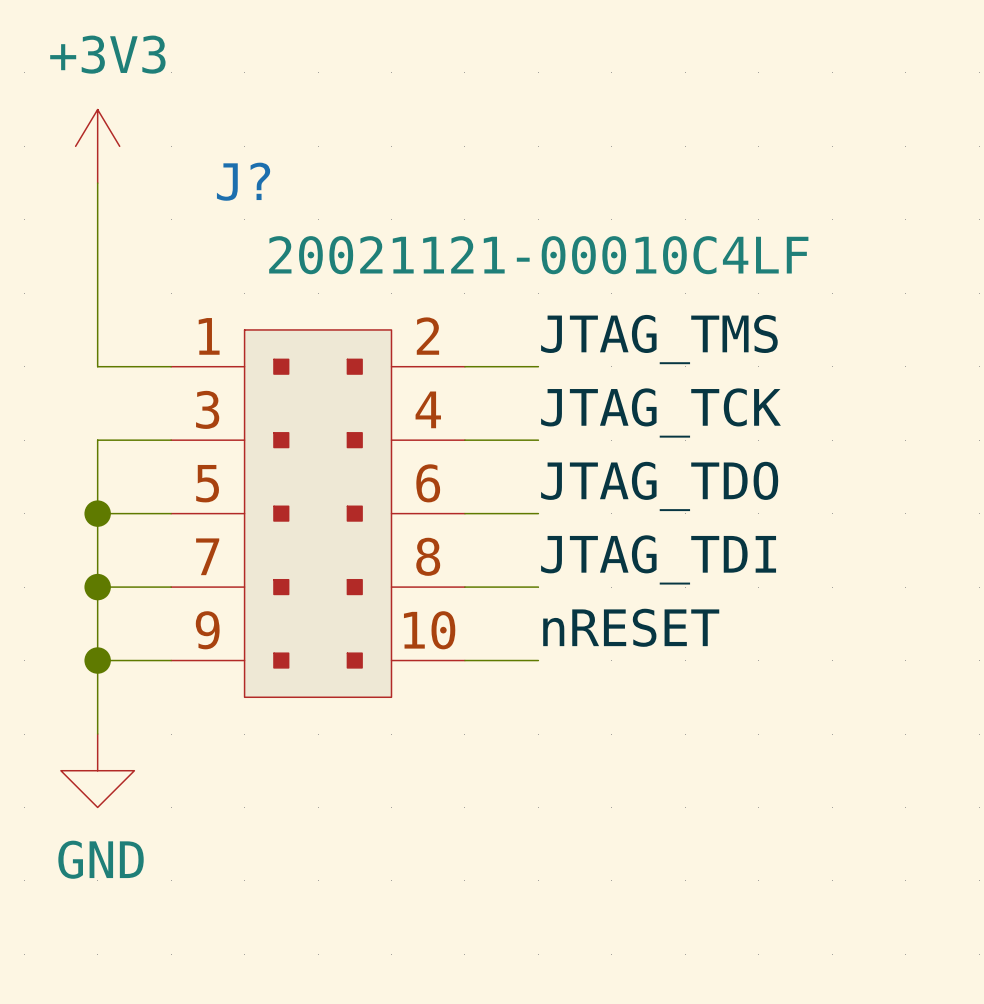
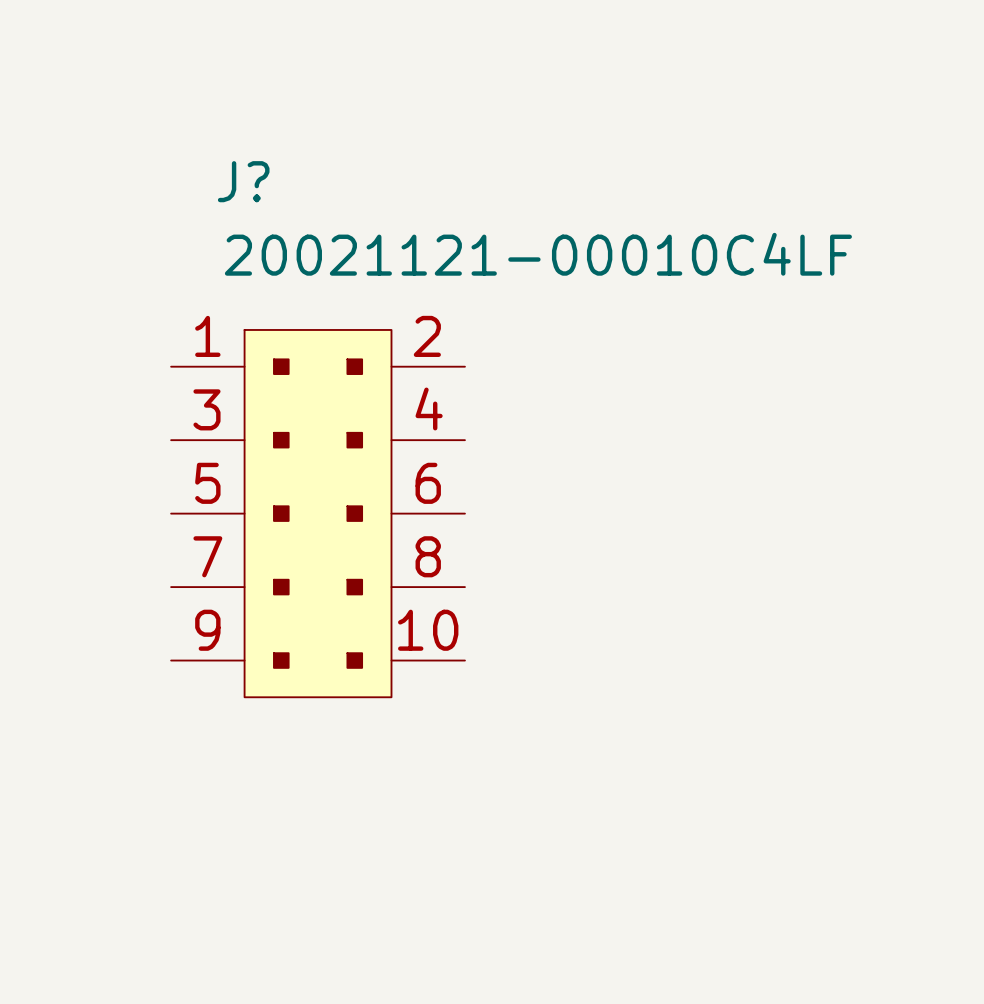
power symbol: +3V3 (97, 146) -> none
wire: (97, 183) (97, 366) (171, 366) -> none
label: JTAG_TMS (659, 339) -> none
wire: (464, 366) (538, 366) -> none
label: JTAG_TCK (660, 412) -> none
wire: (171, 440) (97, 440) (97, 734) -> none
wire: (464, 440) (538, 440) -> none
label: JTAG_TDO (659, 486) -> none
wire: (97, 513) (171, 513) -> none
junction: (97, 513) -> none
wire: (464, 513) (538, 513) -> none
label: JTAG_TDI (658, 559) -> none
wire: (97, 587) (171, 587) -> none
junction: (97, 587) -> none
wire: (464, 587) (538, 587) -> none
label: nRESET (631, 627) -> none
wire: (97, 660) (171, 660) -> none
junction: (97, 660) -> none
wire: (464, 660) (538, 660) -> none
power symbol: GND (97, 770) -> none

